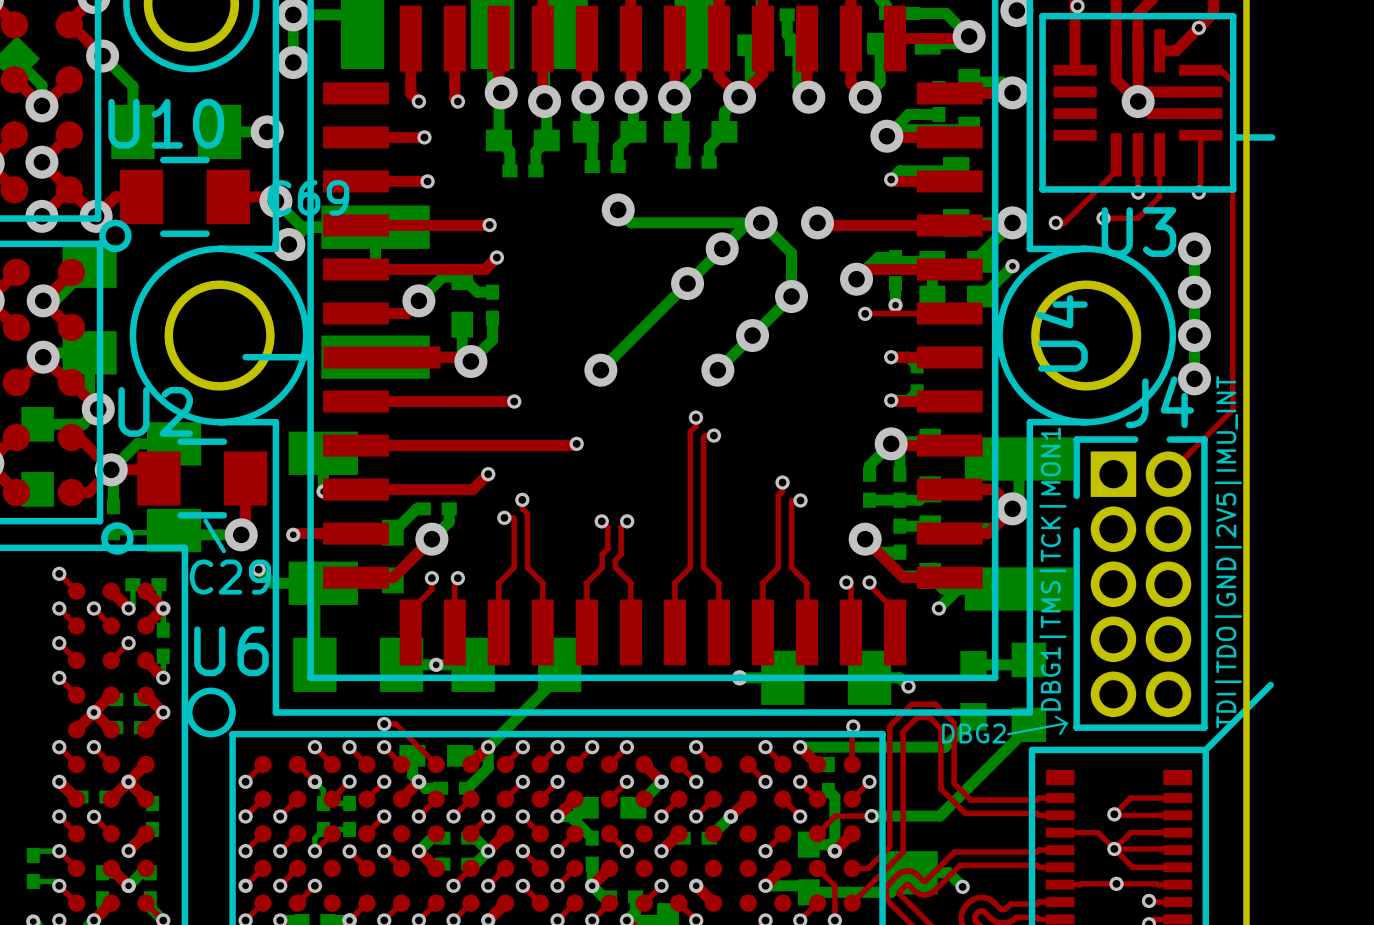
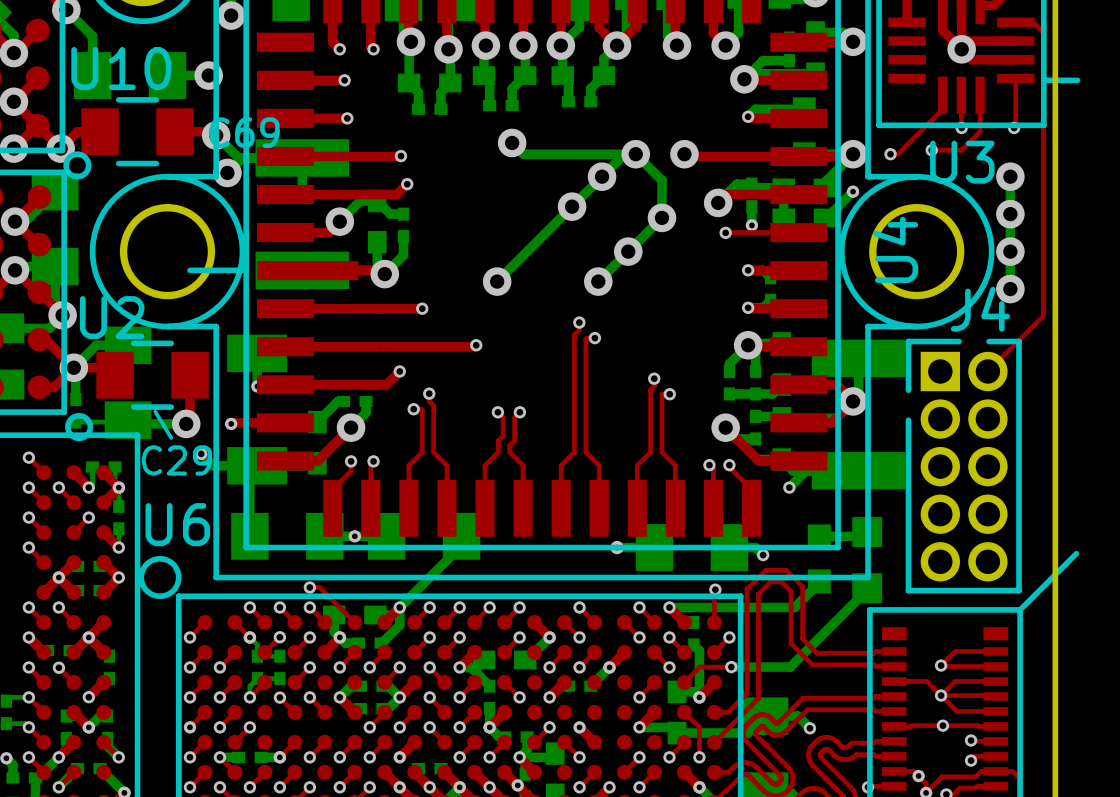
text: TDI|TDO|GND|2V5|IMU_INT (1228, 552) -> none
text: DBG1|TMS|TCK|MON1 (1052, 569) -> none
line: (1055, 716) (1066, 723) -> none
line: (1066, 723) (1060, 734) -> none
line: (1066, 723) (1008, 734) -> none
text: DBG2 (973, 733) -> none

